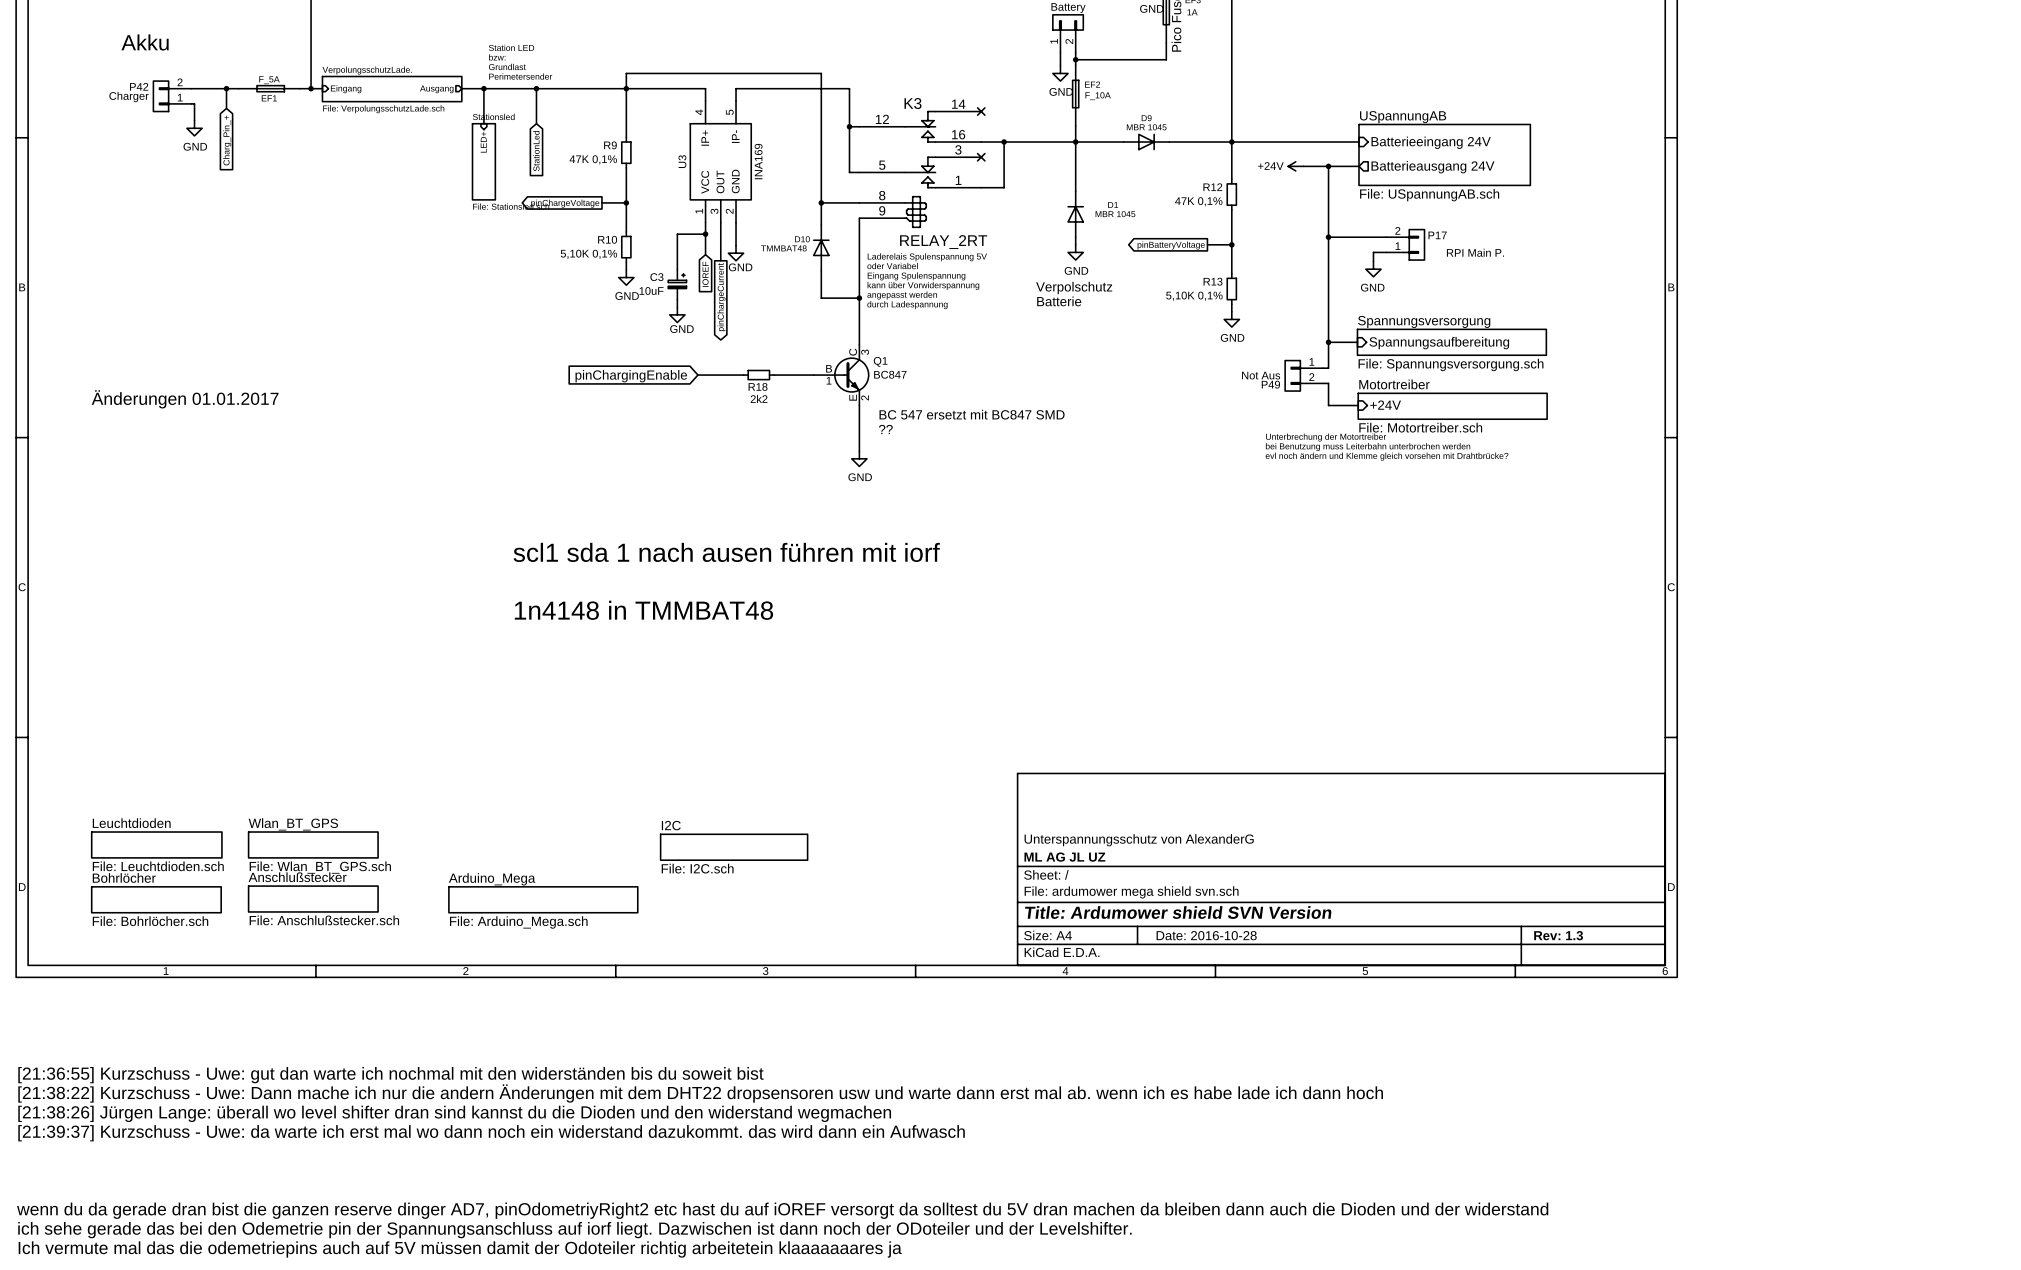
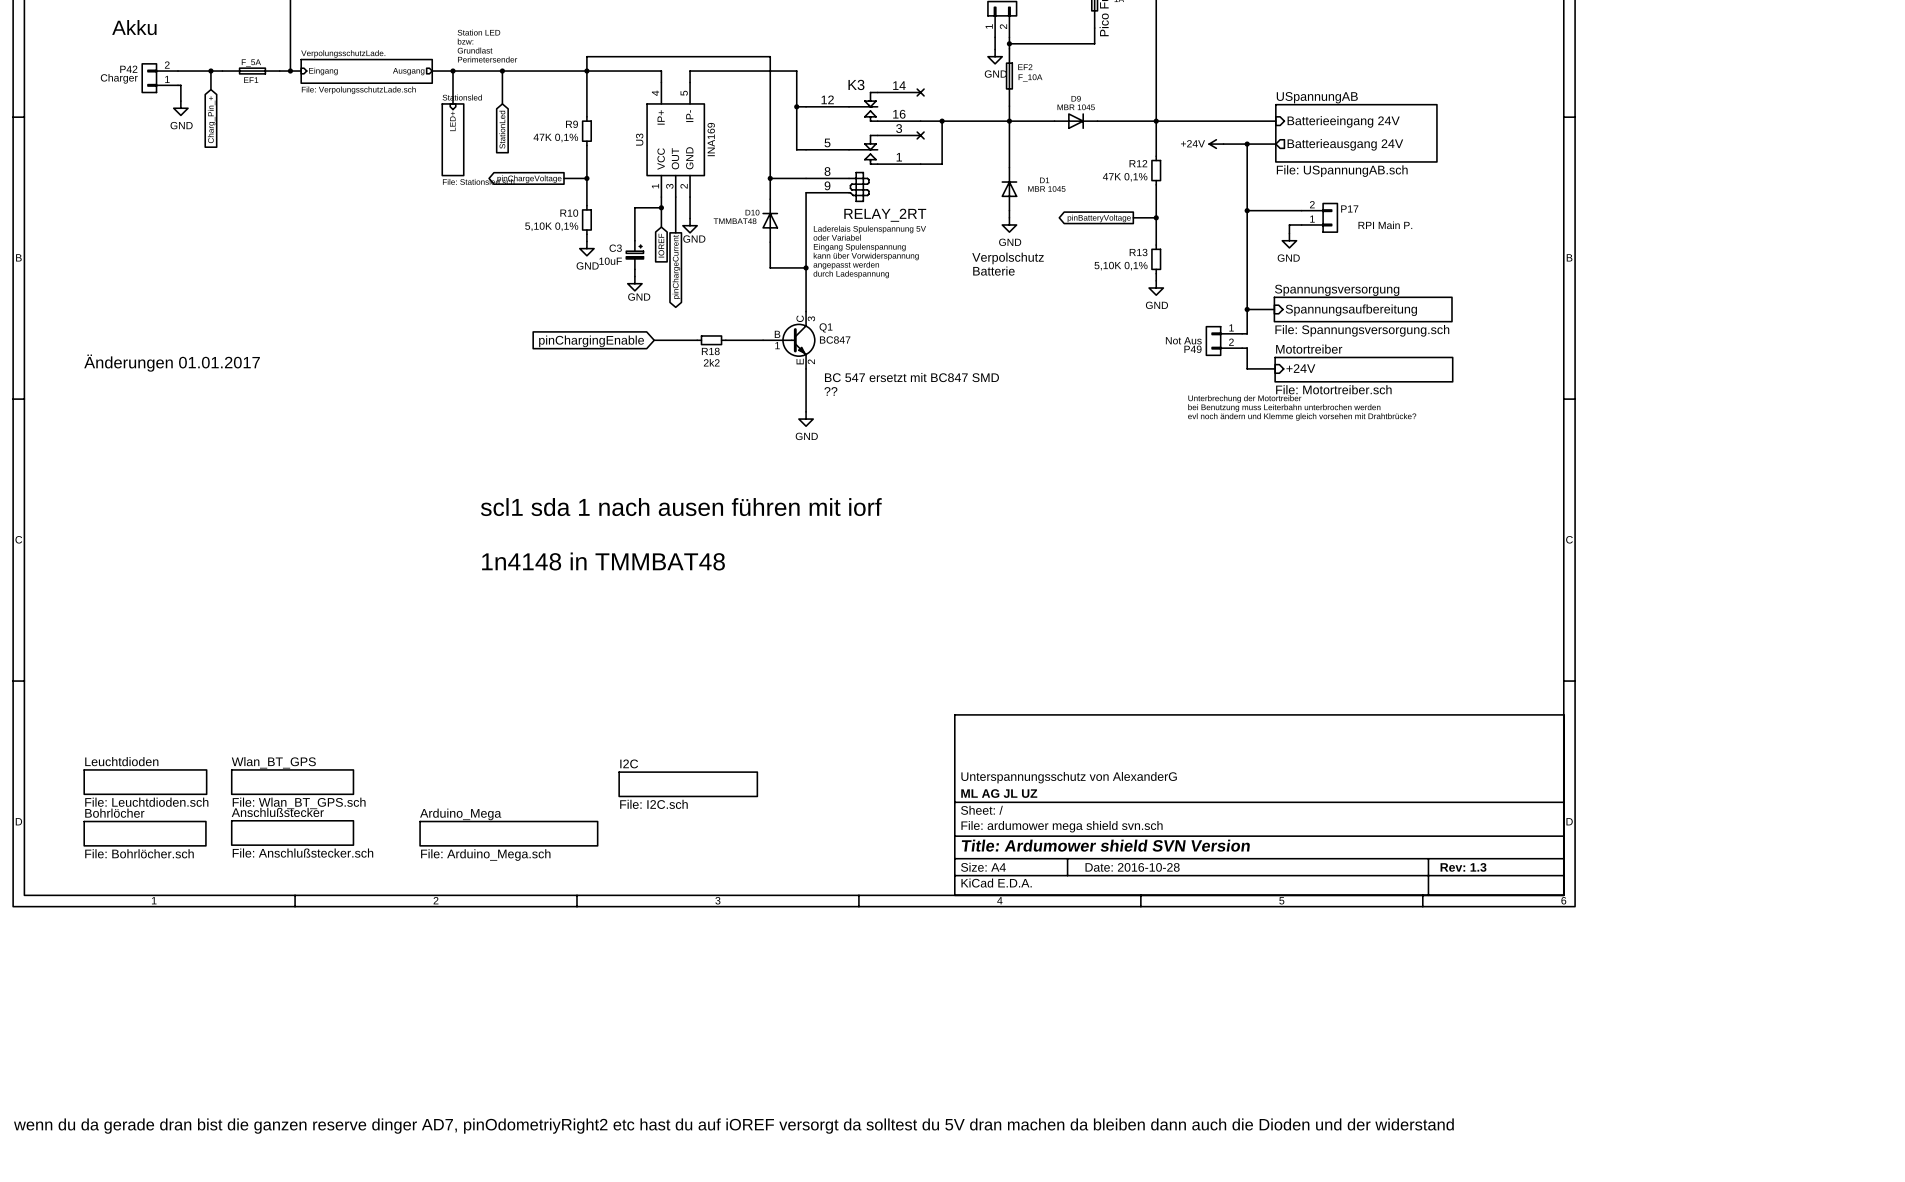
text: [21:36:55] Kurzschuss - Uwe: gut dan warte ich nochmal mit den widerständen bis du soweit bist (390, 1075) -> none
text: [21:38:22] Kurzschuss - Uwe: Dann mache ich nur die andern Änderungen mit dem DHT22 dropsensoren usw und warte dann erst mal ab. wenn ich es habe lade ich dann hoch (700, 1093) -> none
text: [21:38:26] Jürgen Lange: überall wo level shifter dran sind kannst du die Dioden und den widerstand wegmachen (454, 1113) -> none
text: [21:39:37] Kurzschuss - Uwe: da warte ich erst mal wo dann noch ein widerstand dazukommt. das wird dann ein Aufwasch (491, 1133) -> none
text: ich sehe gerade das bei den Odemetrie pin der Spannungsanschluss auf iorf liegt. Dazwischen ist dann noch der ODoteiler und der Levelshifter. (574, 1230) -> none
text: Ich vermute mal das die odemetriepins auch auf 5V müssen damit der Odoteiler richtig arbeitetein klaaaaaaares ja (460, 1249) -> none

